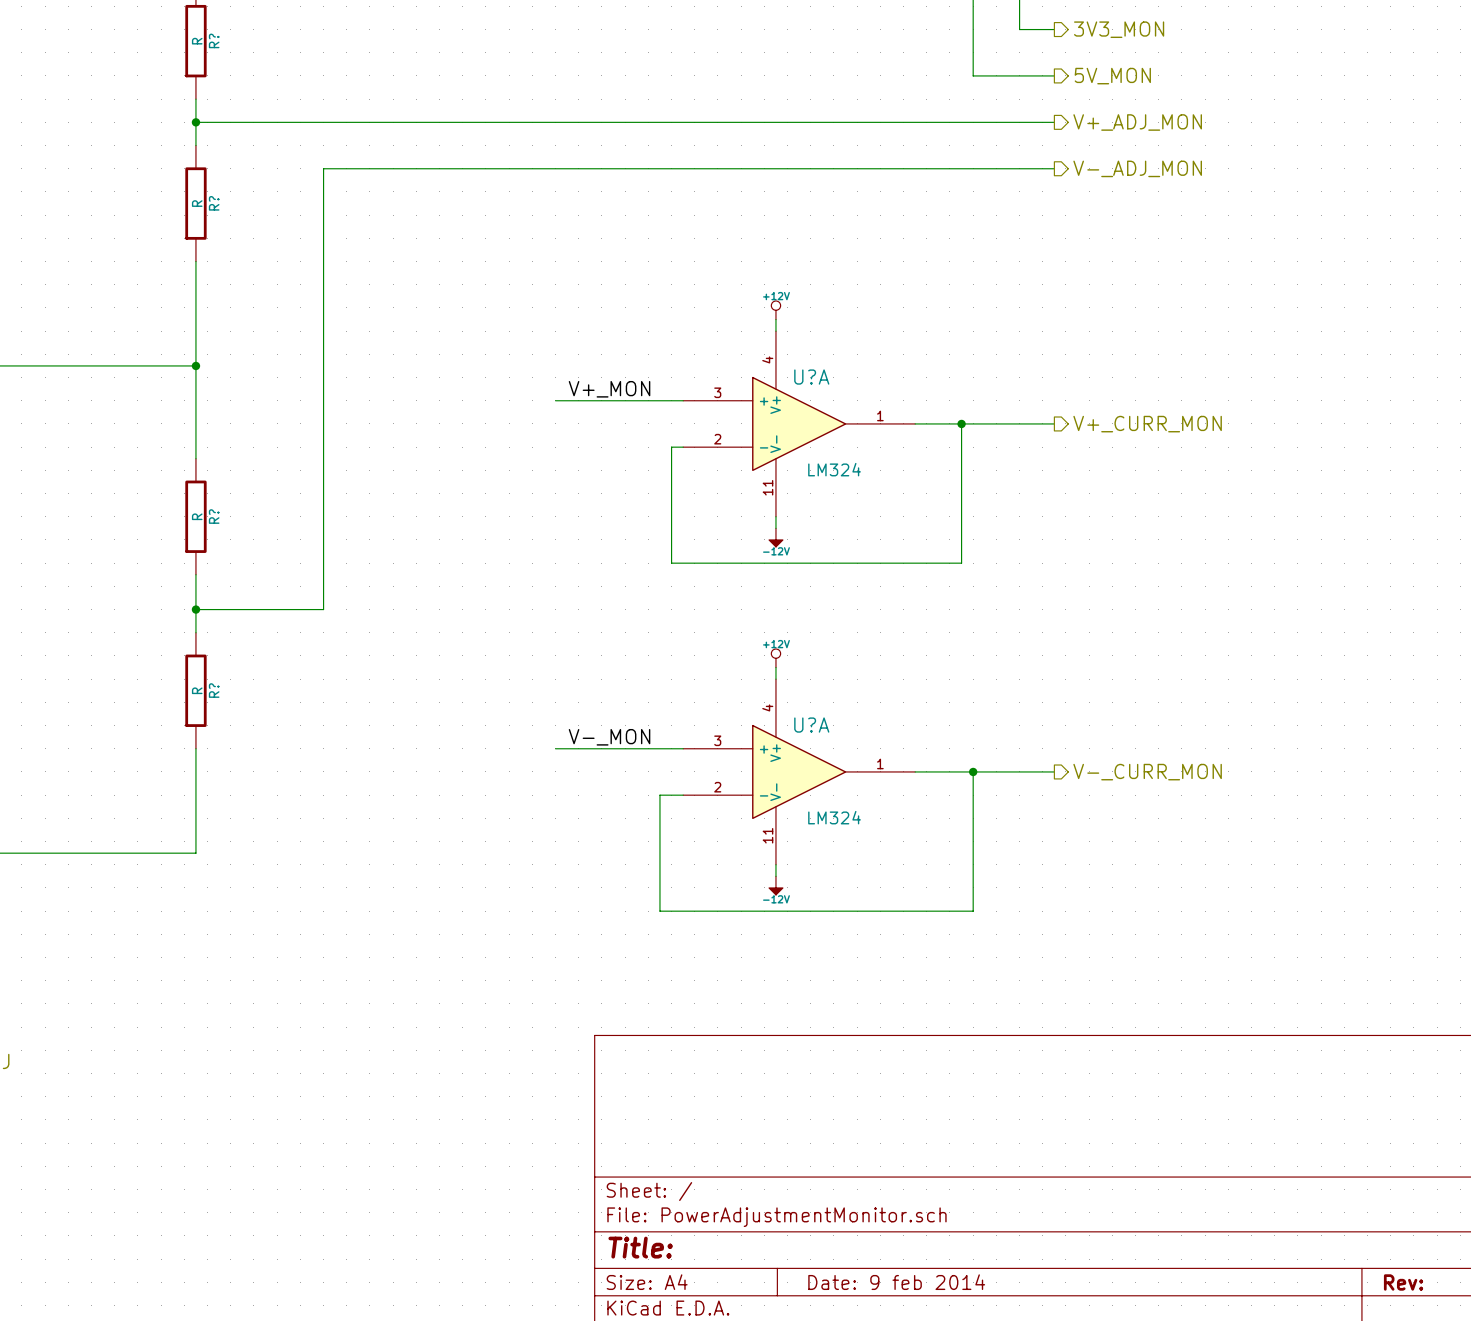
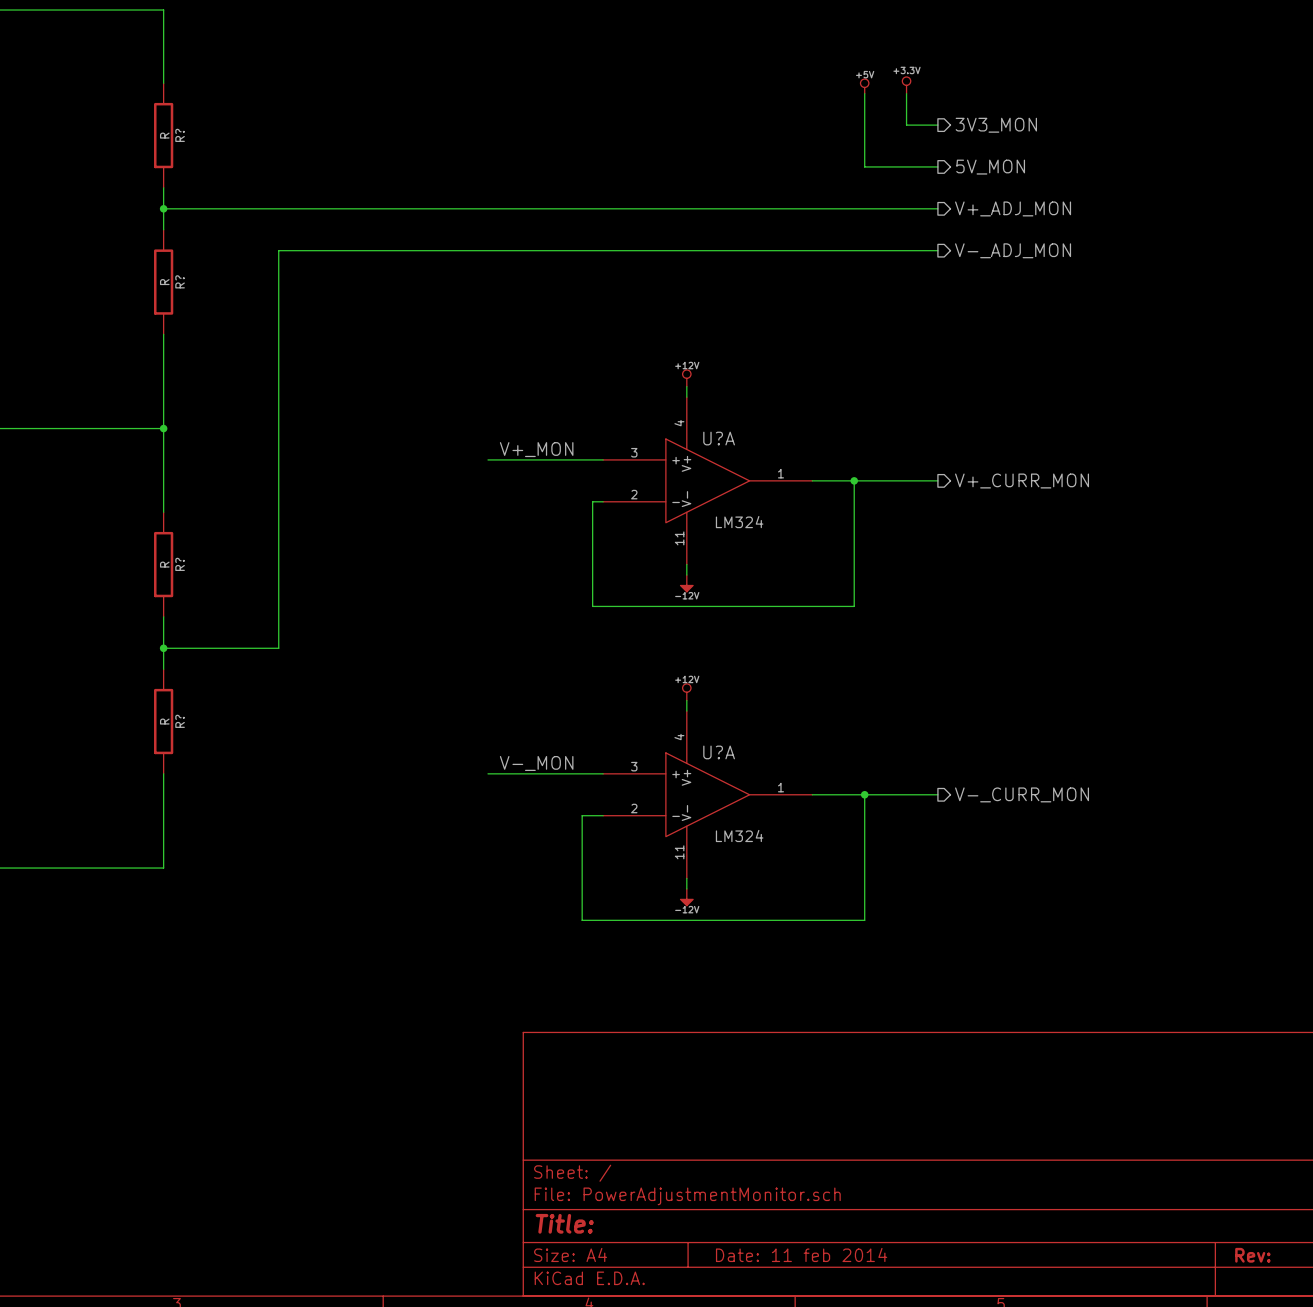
title block: Date: 9 feb 2014 (896, 1282) -> Date: 11 feb 2014 (801, 1254)

